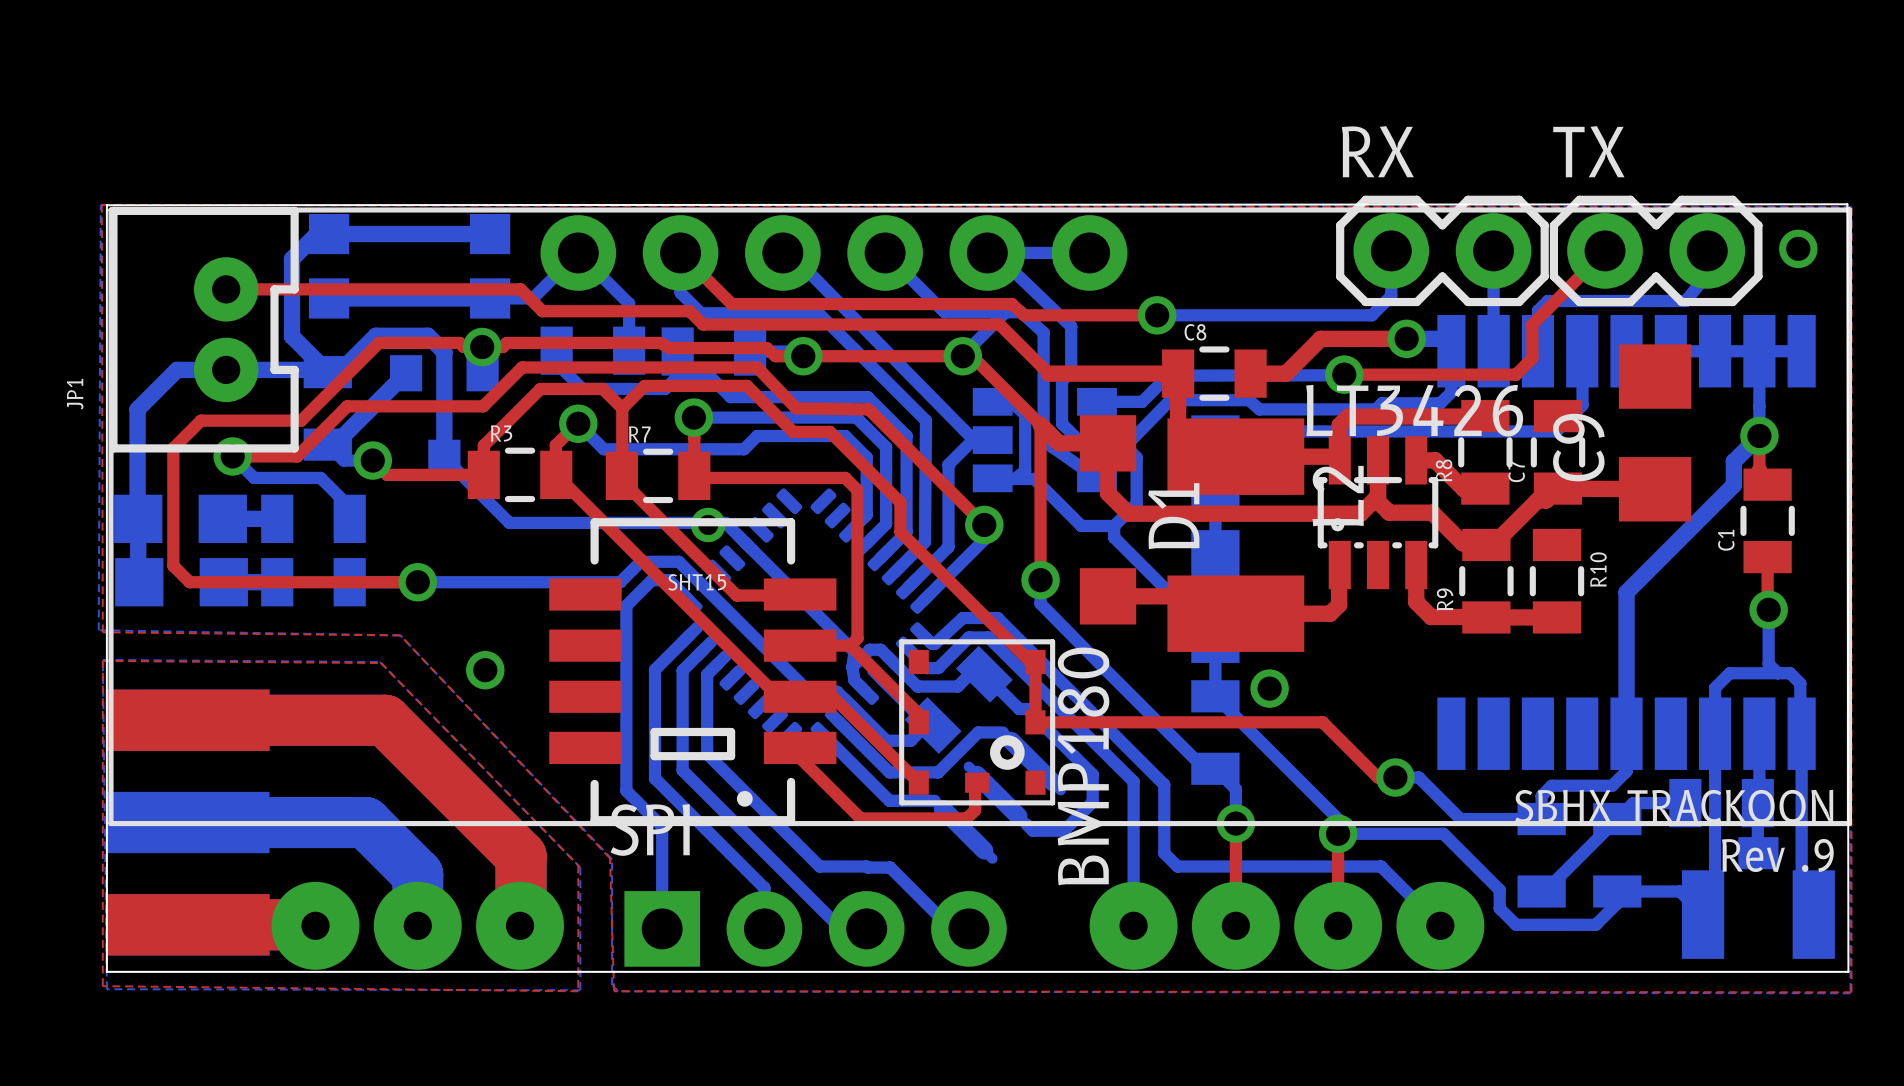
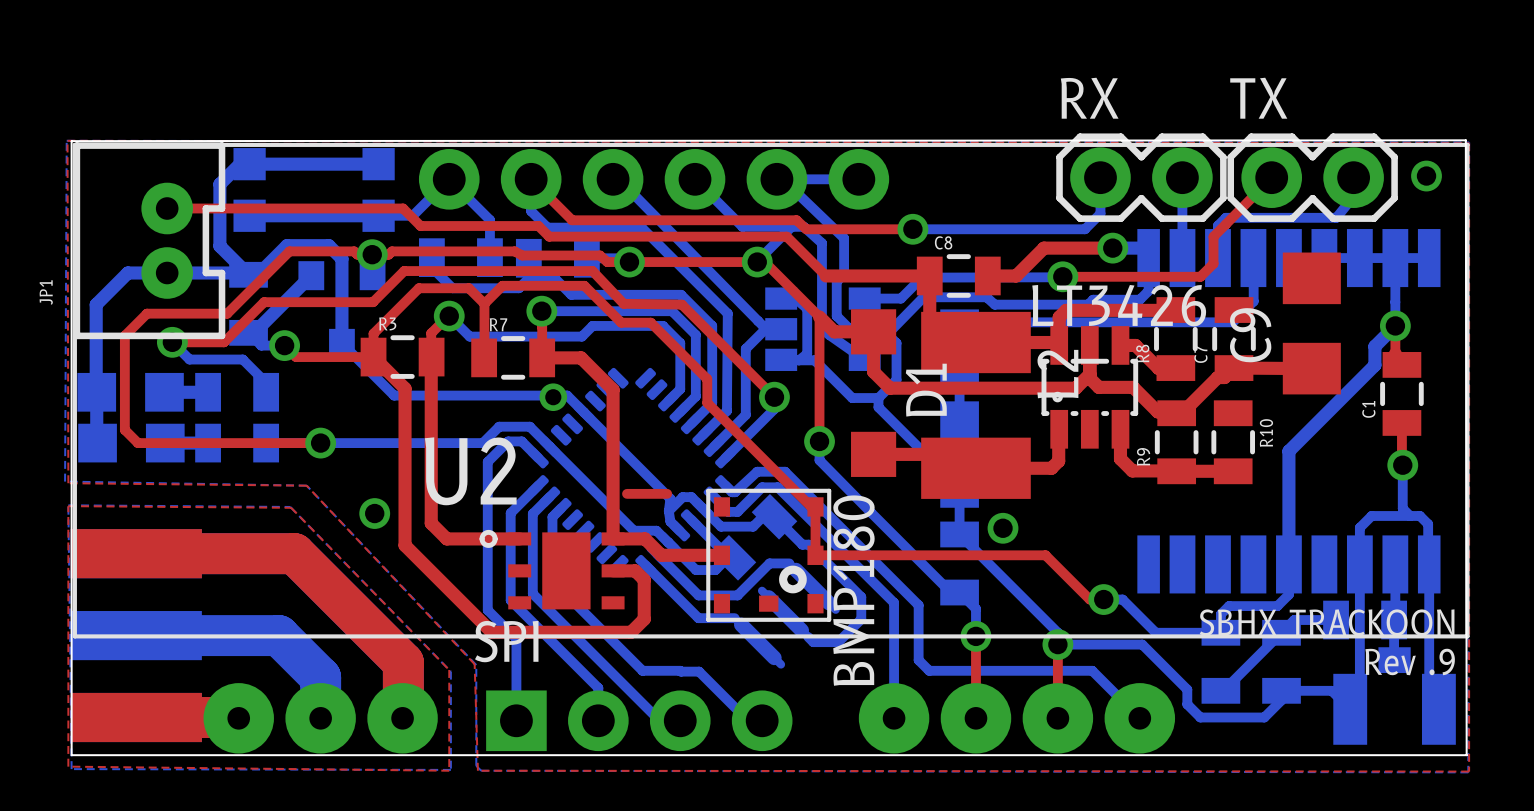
top track: none -> (373, 357) (405, 388) (405, 545) (491, 632) (631, 632) (644, 619) (644, 579) (635, 570) (613, 570)
top track: (556, 474) (778, 696) (832, 696) (918, 782) -> (431, 357) (431, 523) (446, 538) (519, 538)
top track: (694, 475) (696, 477) (845, 477) (857, 490) (857, 638) (850, 645) (918, 714) (918, 722) -> (542, 357) (581, 357) (613, 389) (613, 538) (645, 538) (661, 555) (721, 555)
top track: (621, 480) (736, 595) (800, 594) -> none
SHT15: (692, 671) -> none
U2: none -> (552, 569)
top track: (800, 747) (800, 758) (860, 818) (966, 818) (975, 810) (975, 784) (977, 782) -> none

